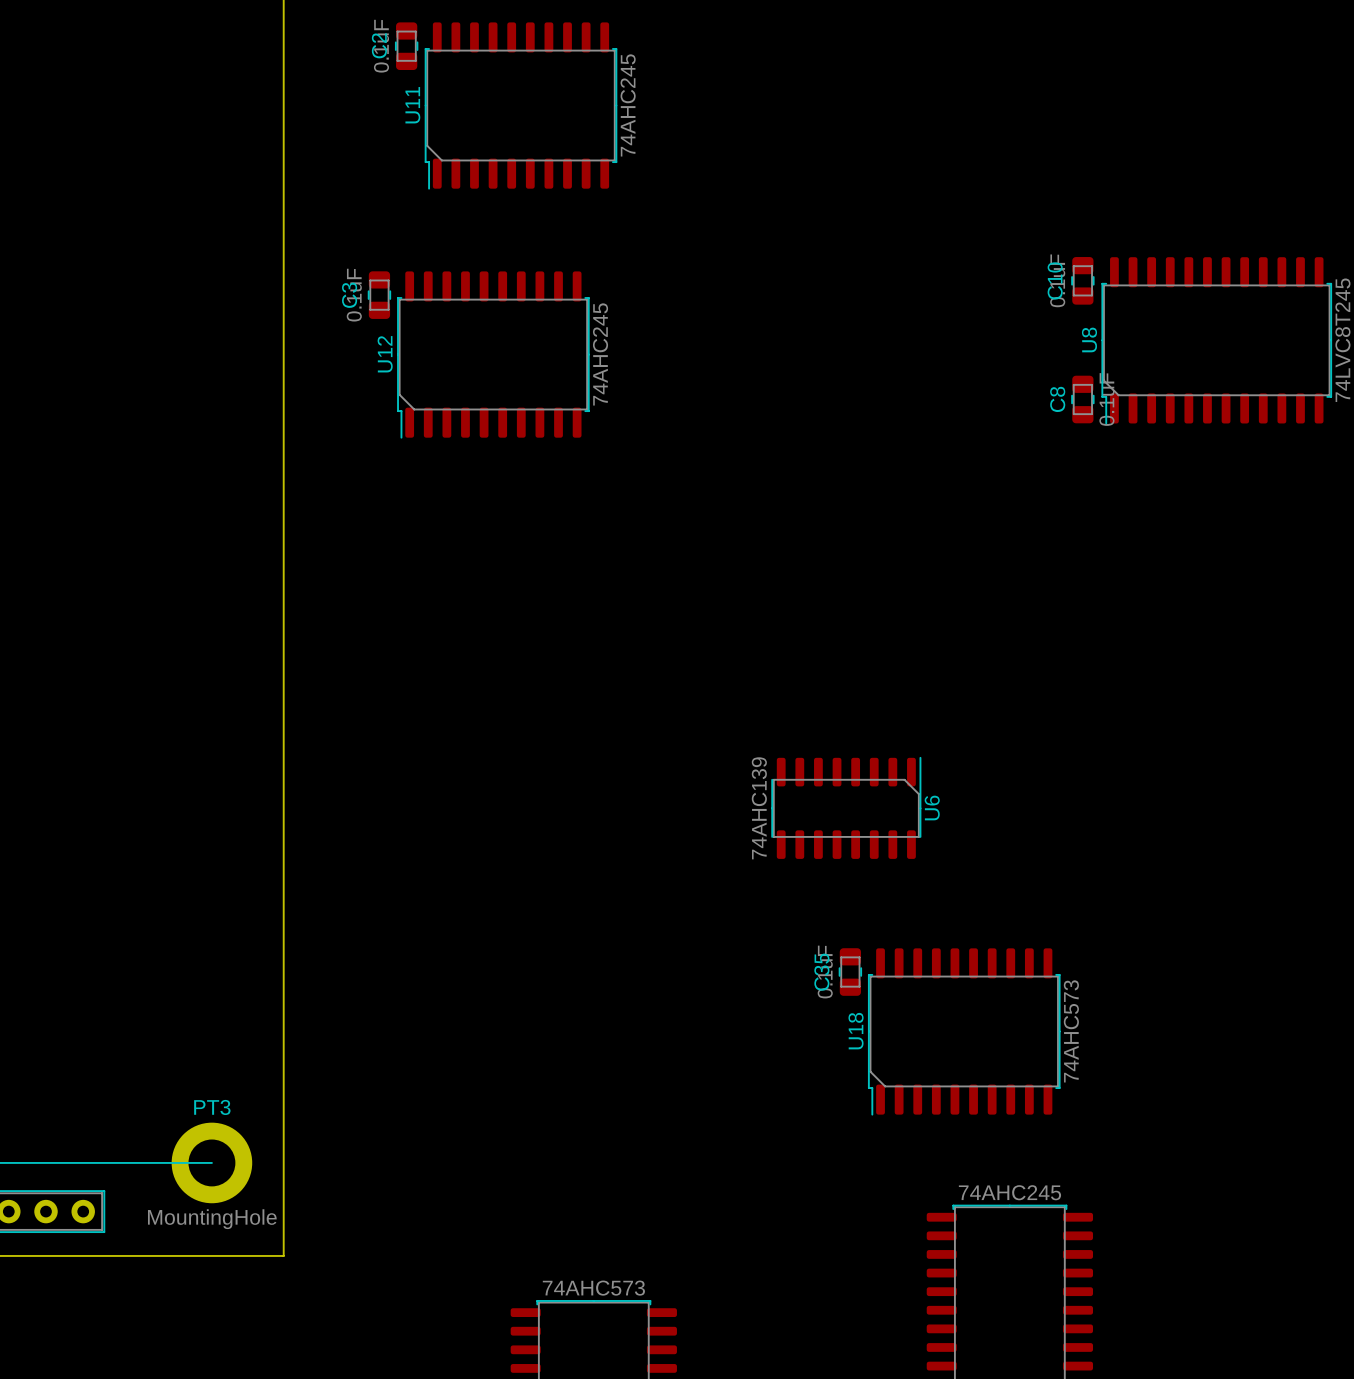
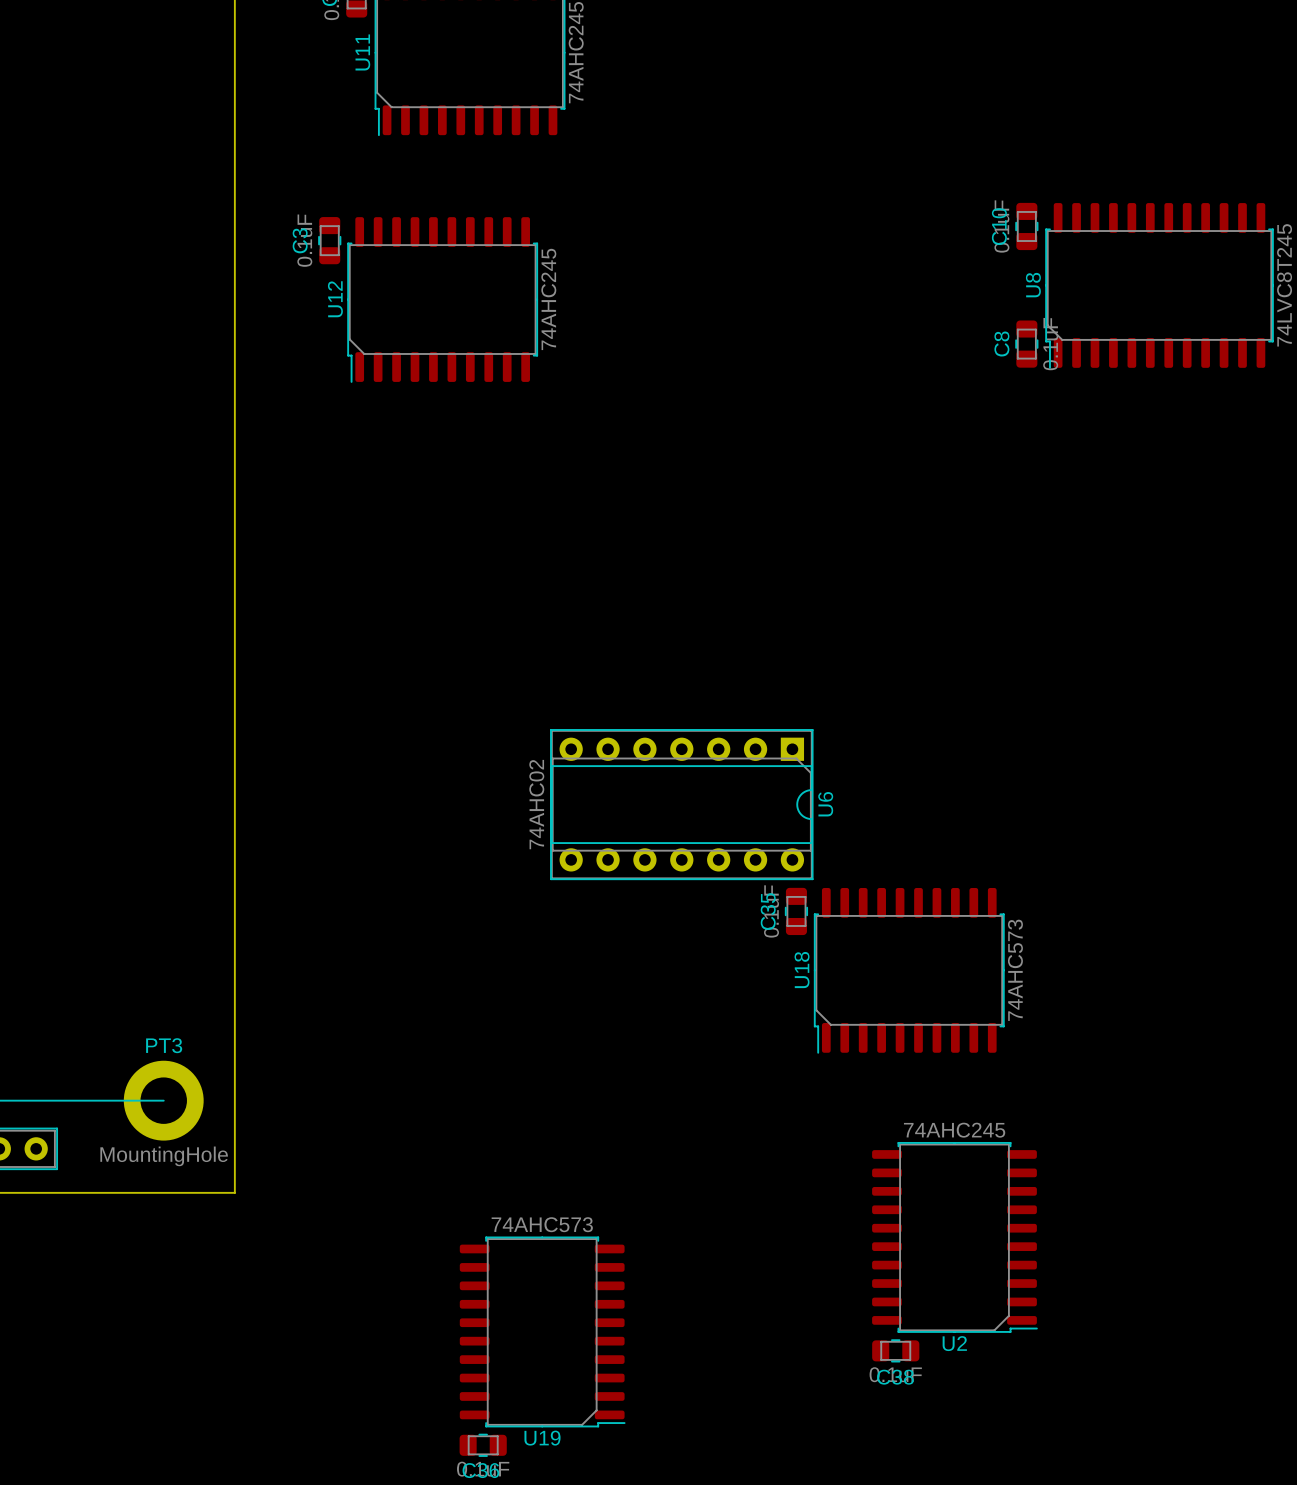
U6 footprint: [771, 756, 922, 859] -> [550, 729, 814, 881]
U6 value: 74AHC139 (759, 808) -> 74AHC02 (536, 804)
U6 name position: U6 (932, 808) -> U6 (825, 804)

